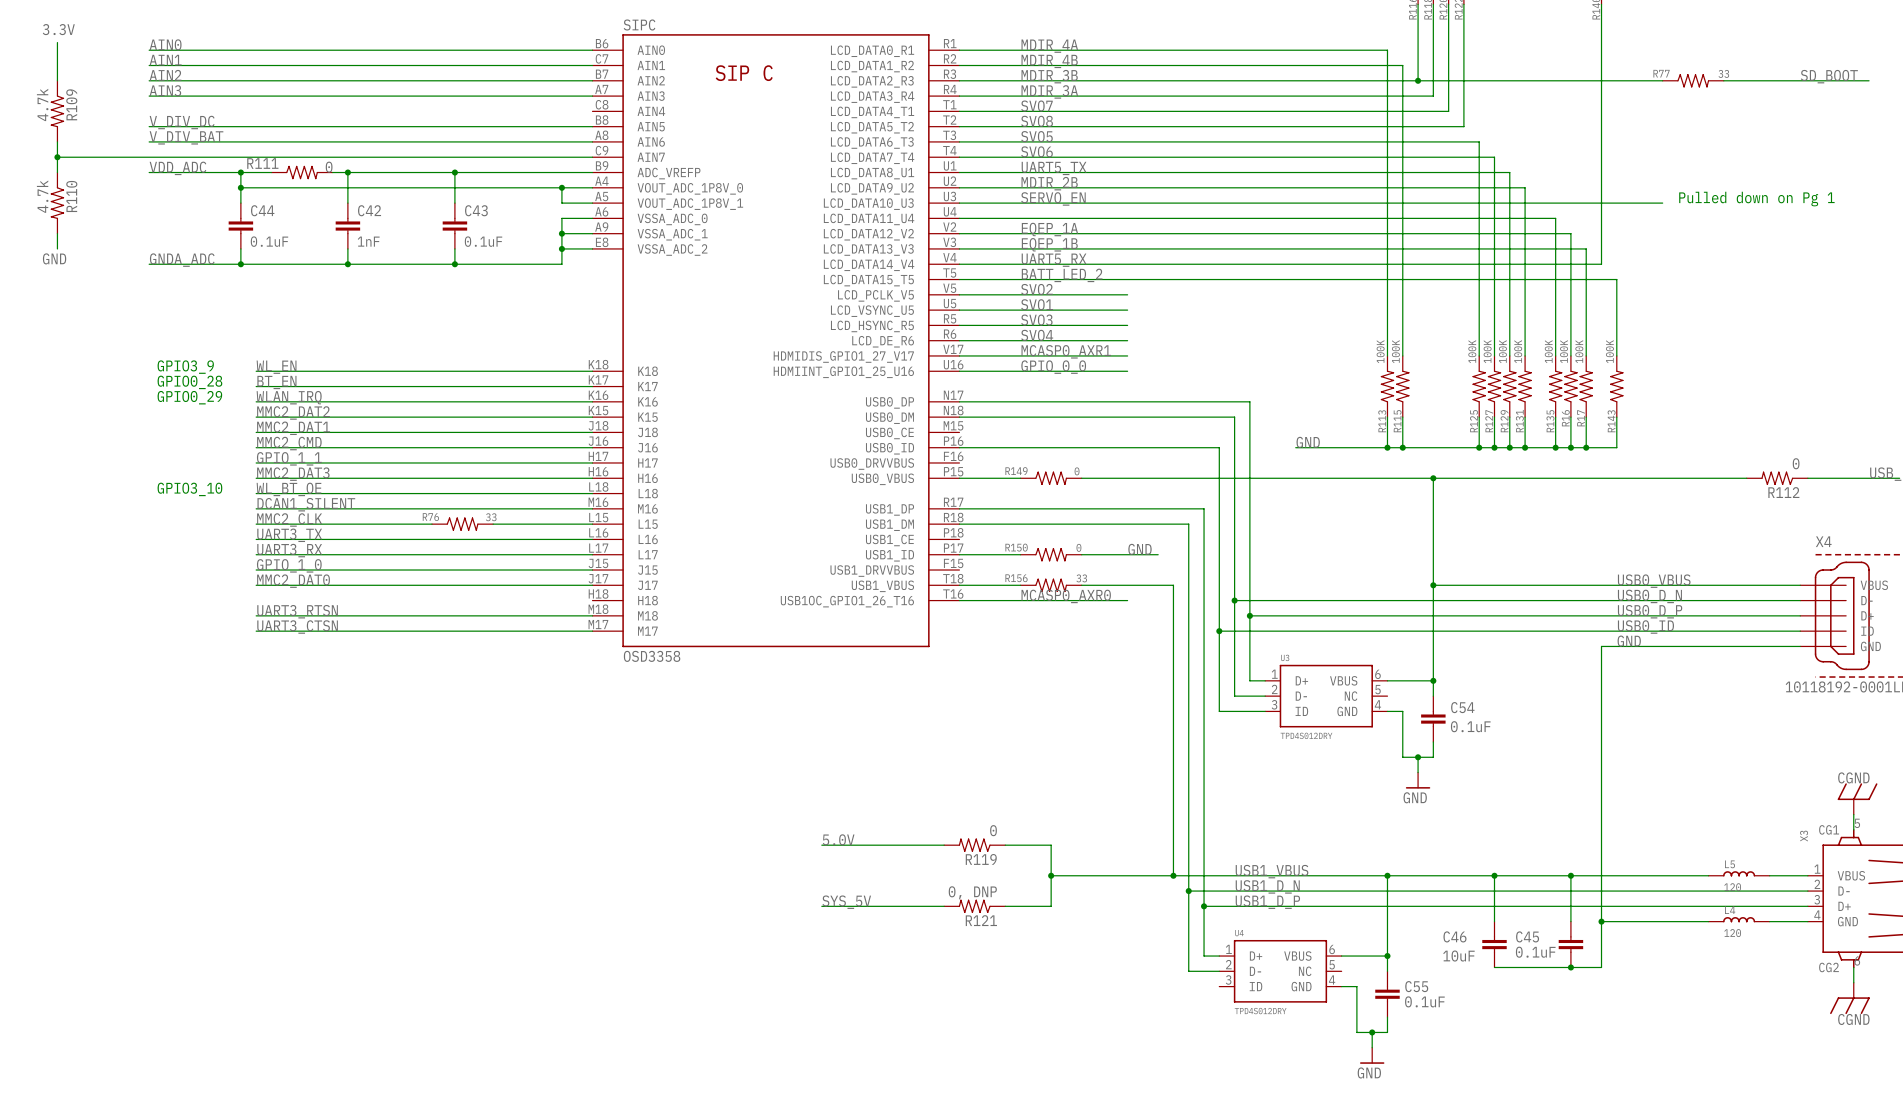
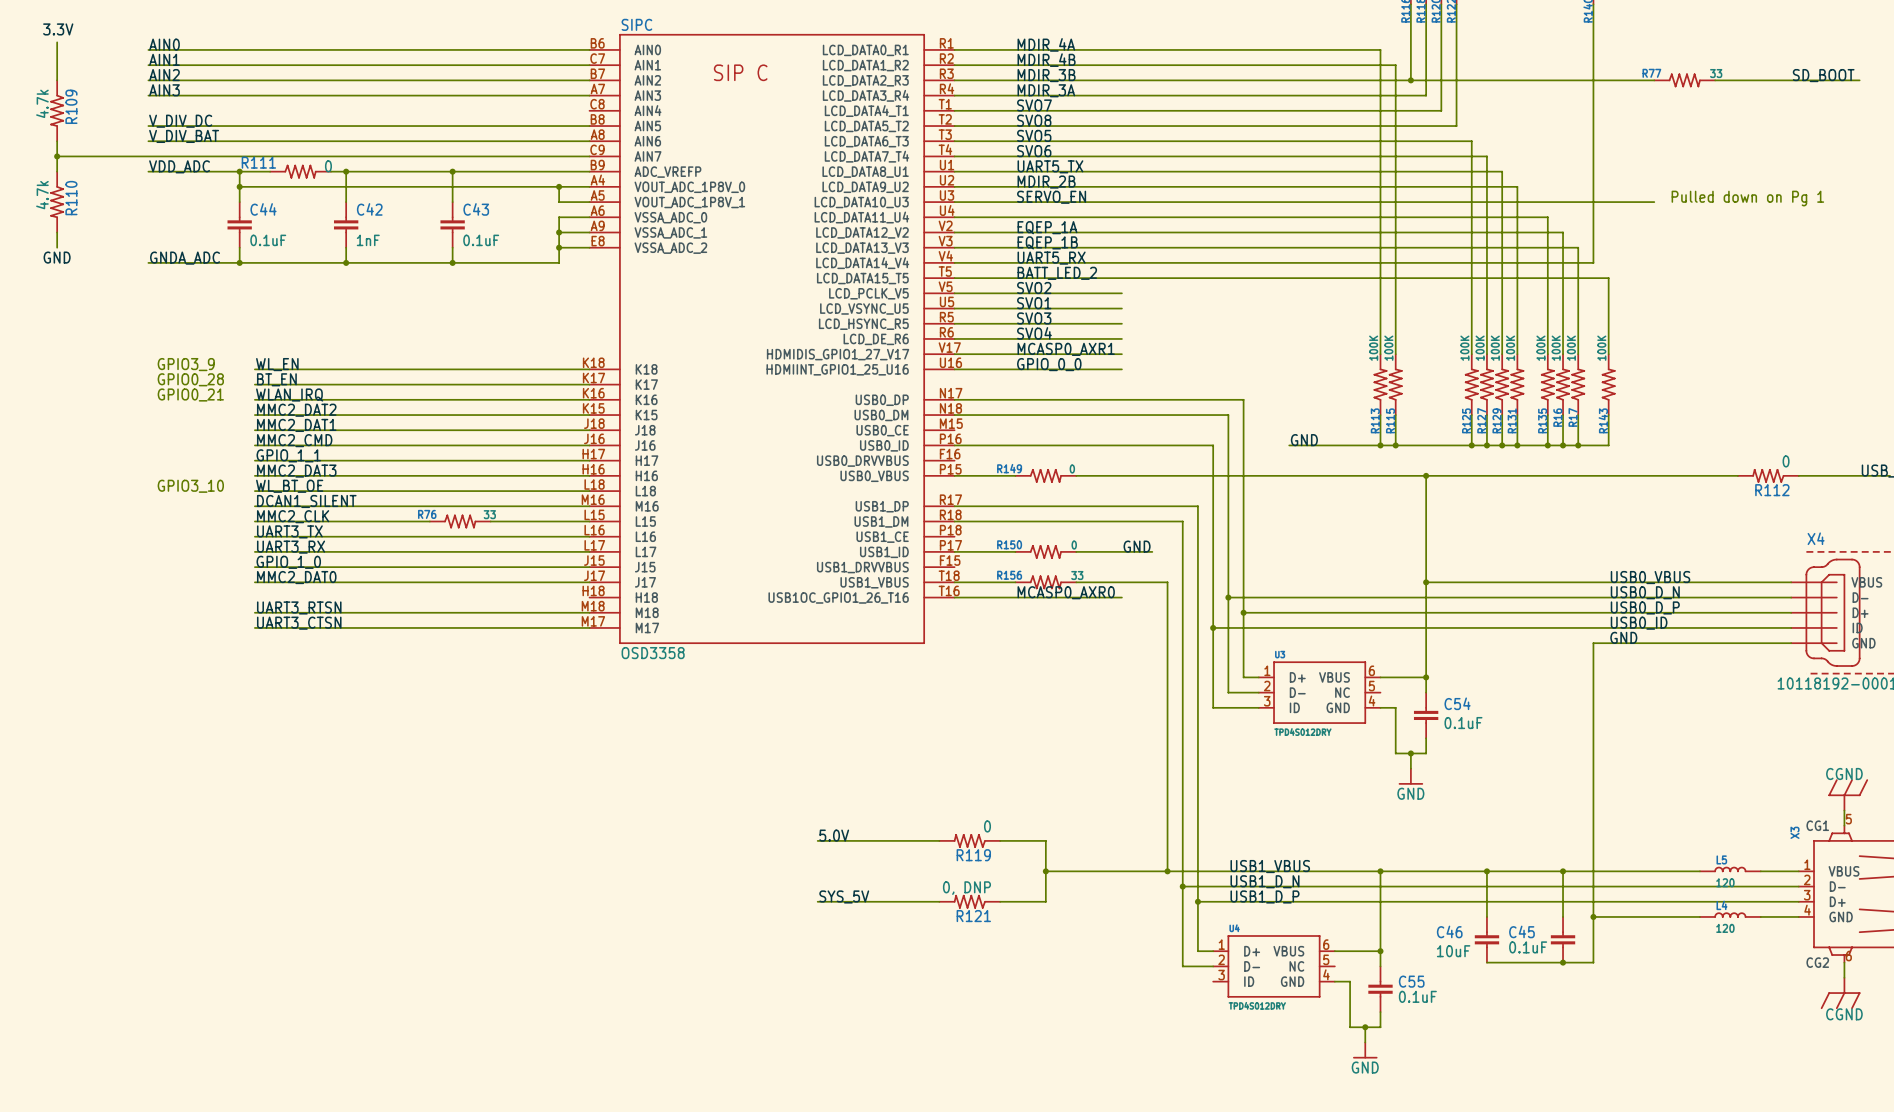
text: GPIO0_29 (189, 397) -> GPIO0_21 (190, 395)

